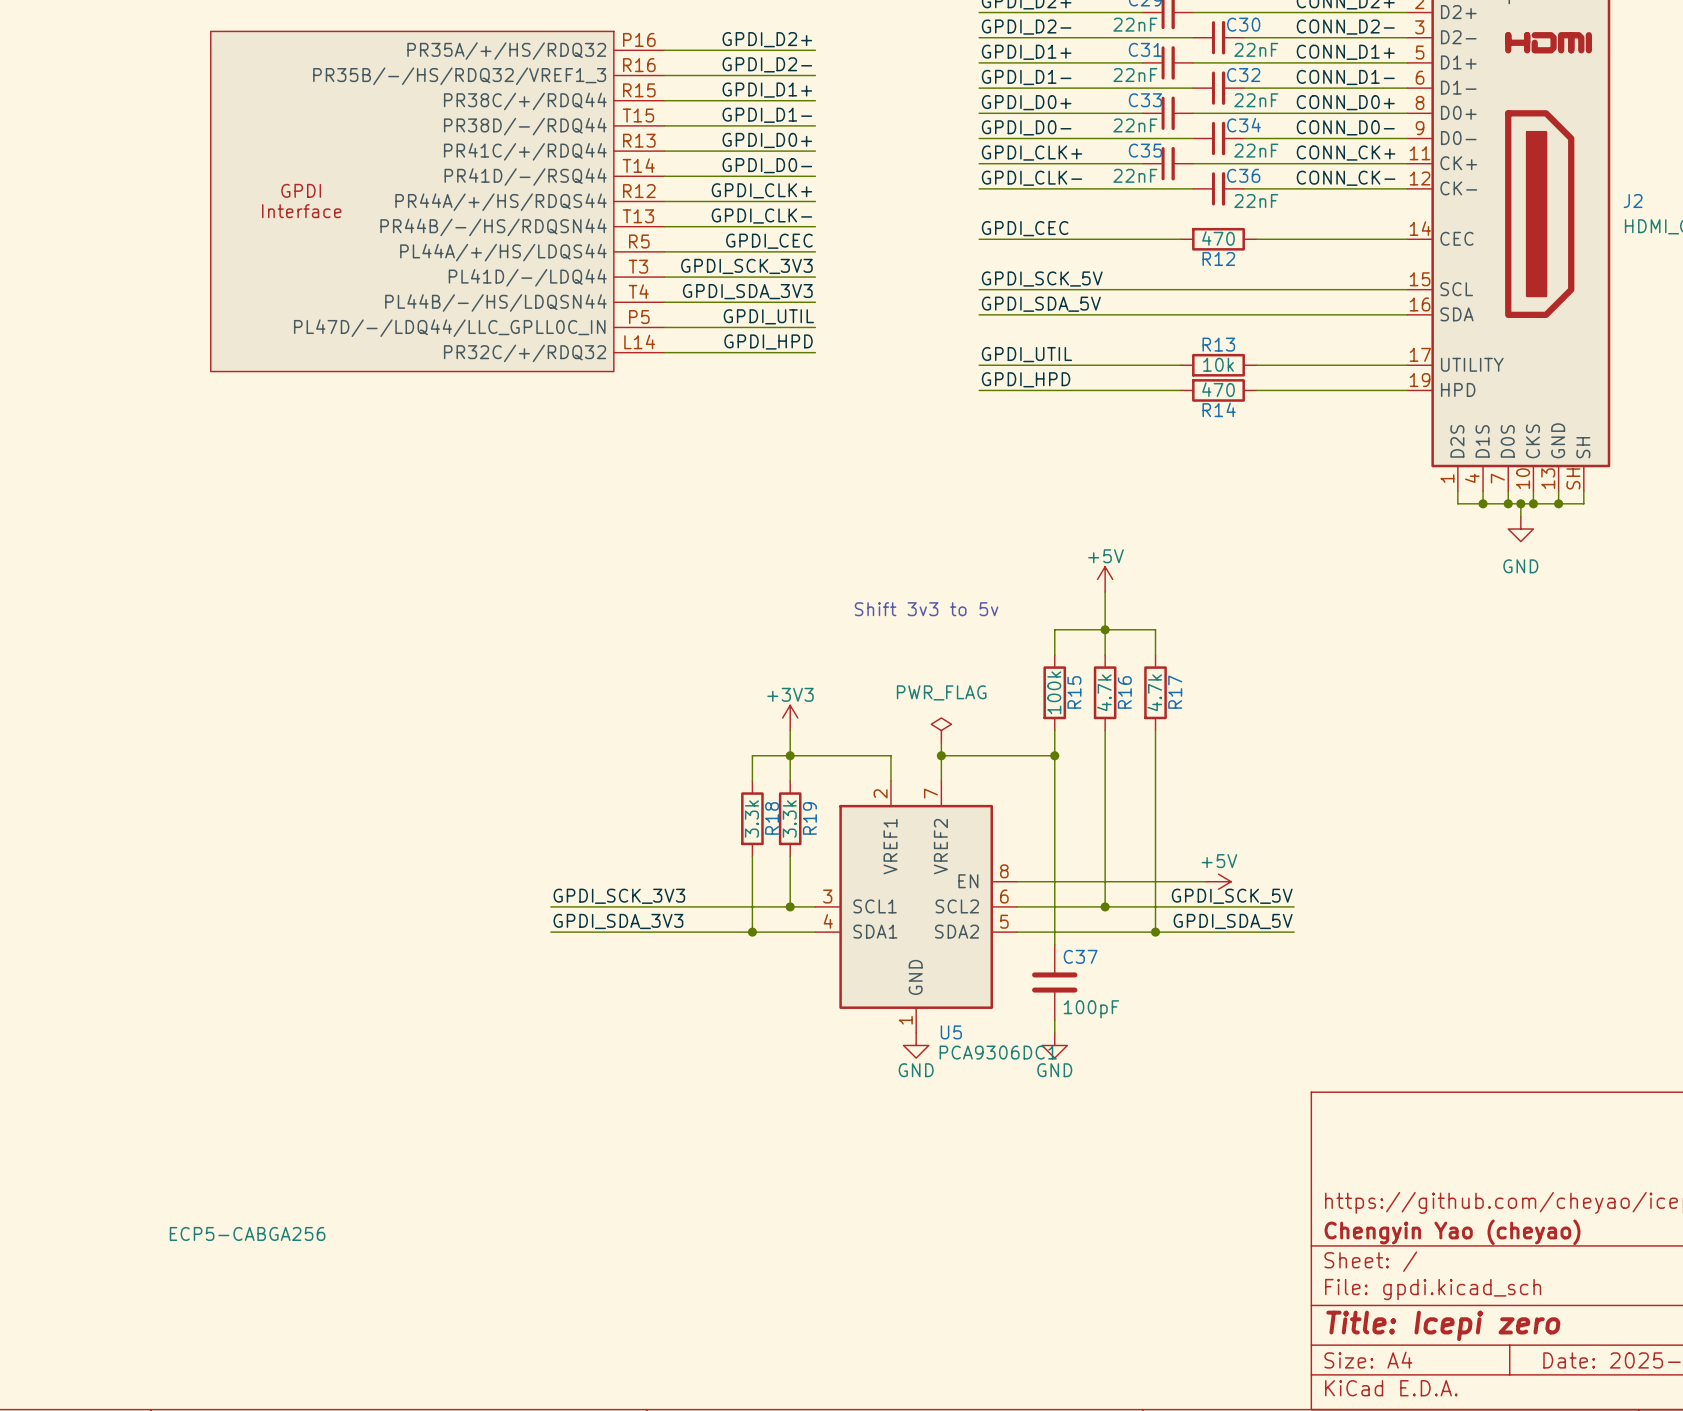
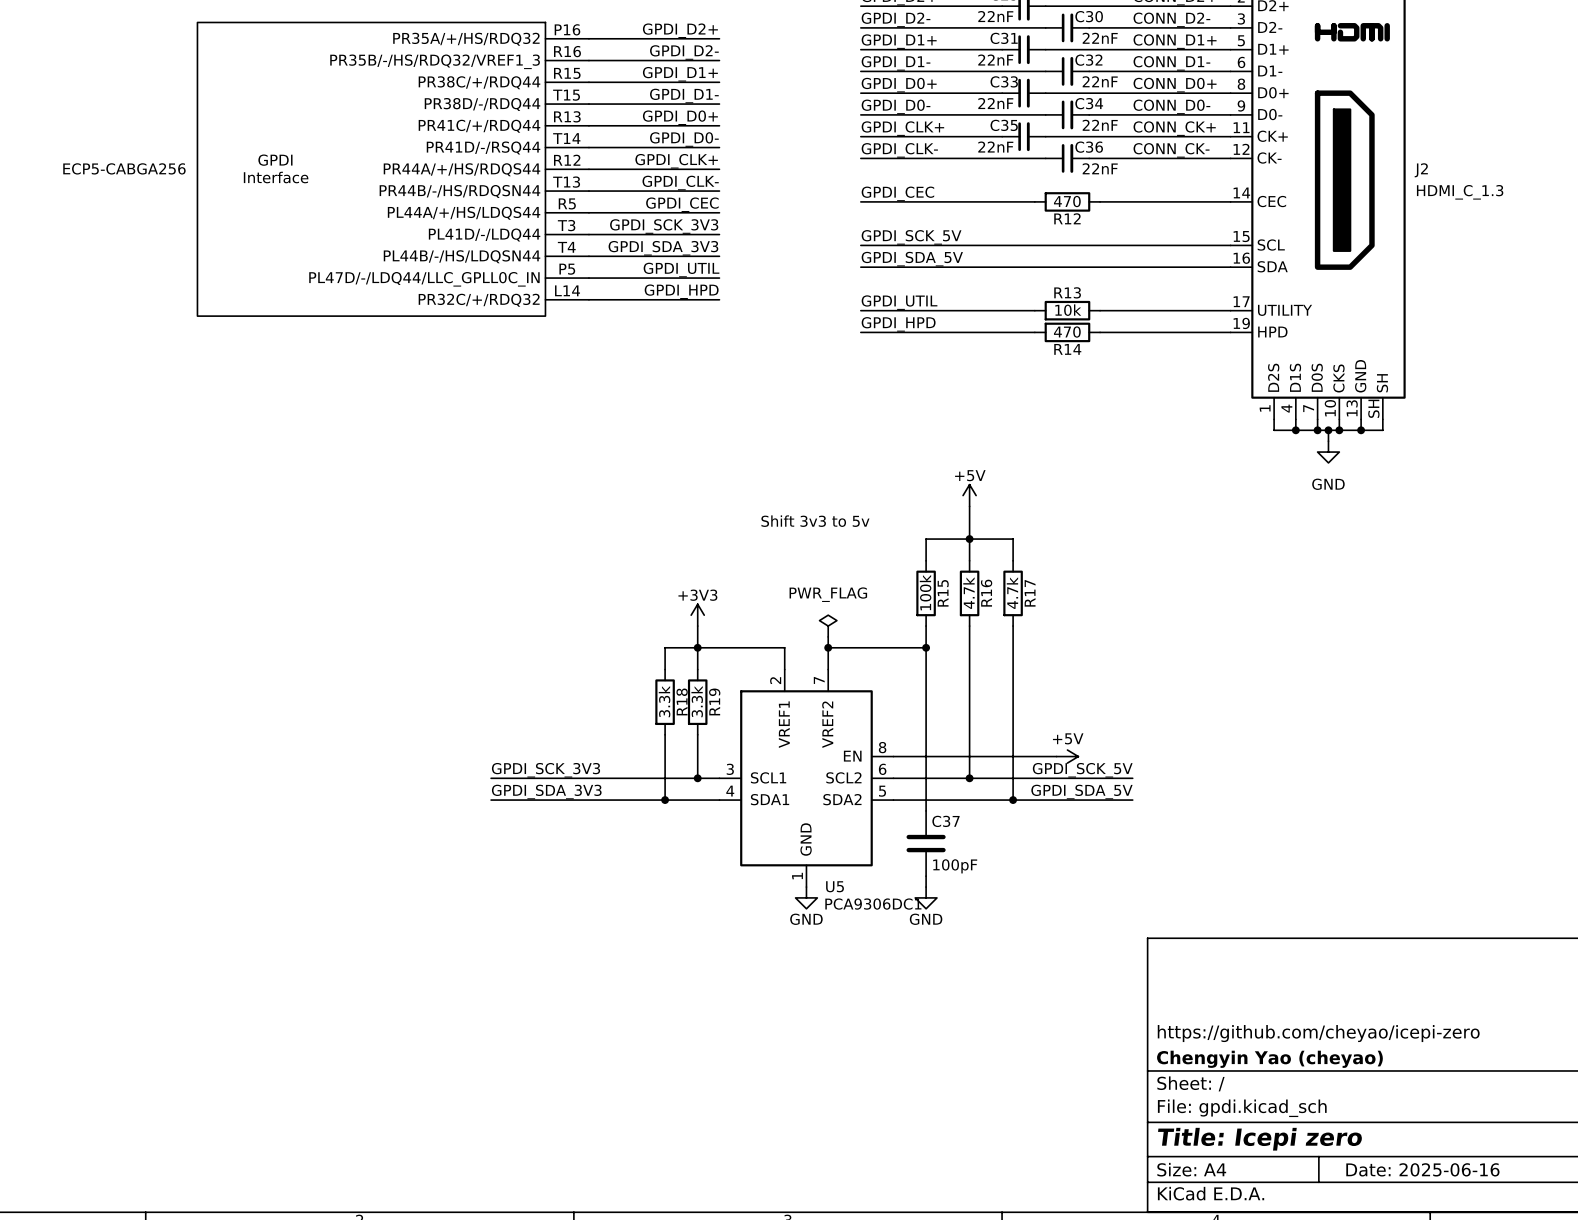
part value position: ECP5-CABGA256 (247, 1233) -> ECP5-CABGA256 (124, 168)

